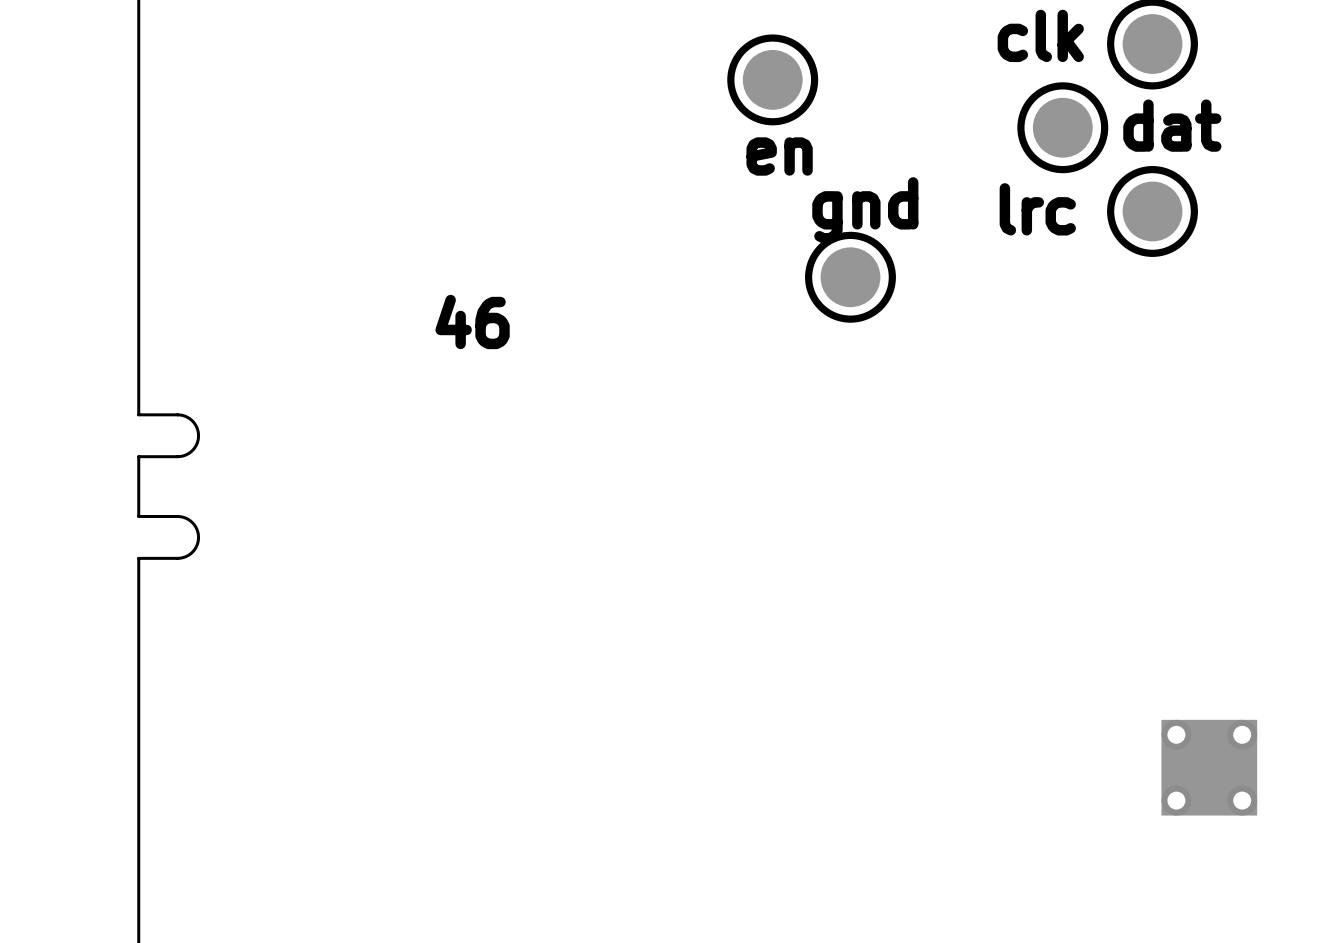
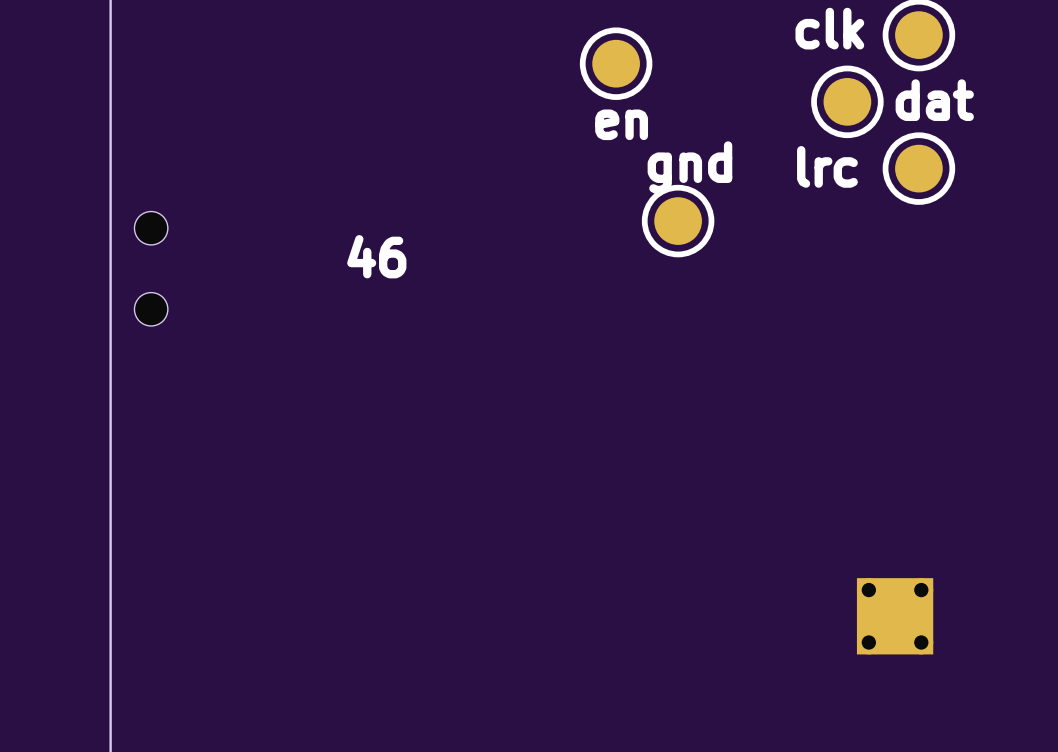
part: none -> (151, 268)
board edge: (138, 414) (185, 416) (194, 423) (198, 435) (194, 447) (185, 455) (138, 456) -> (110, 330) (110, 364)
board edge: (138, 516) (185, 518) (195, 526) (198, 537) (195, 547) (185, 556) (138, 558) -> (110, 411) (110, 445)
part position: (1209, 767) -> (895, 616)

